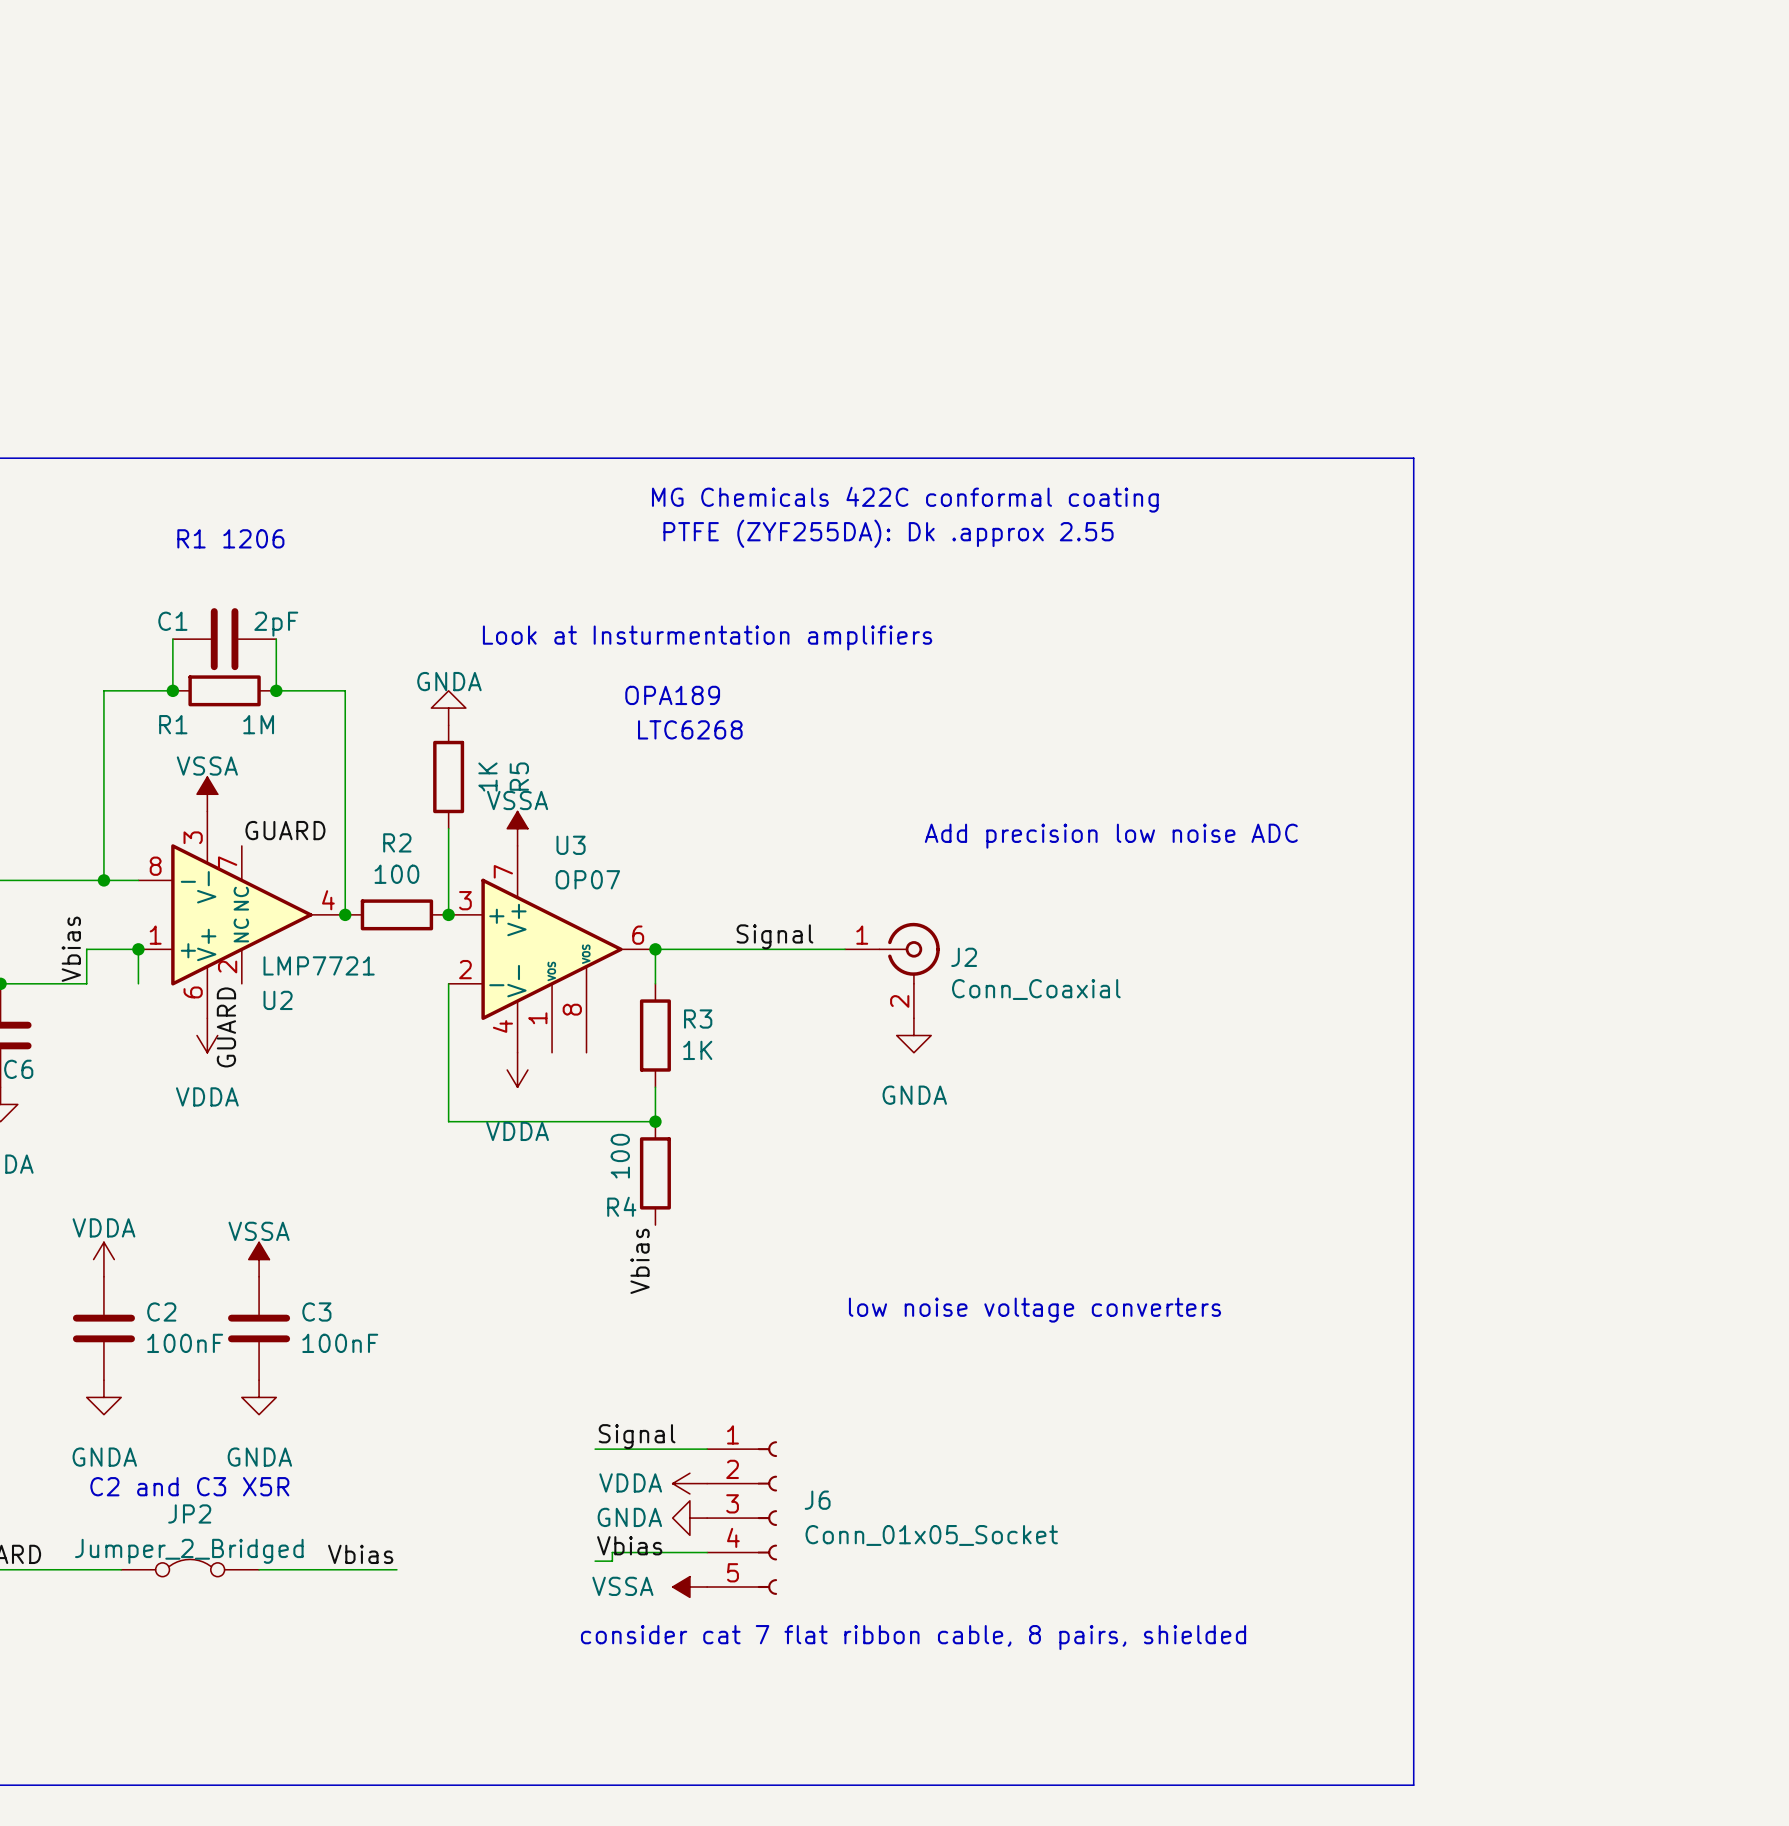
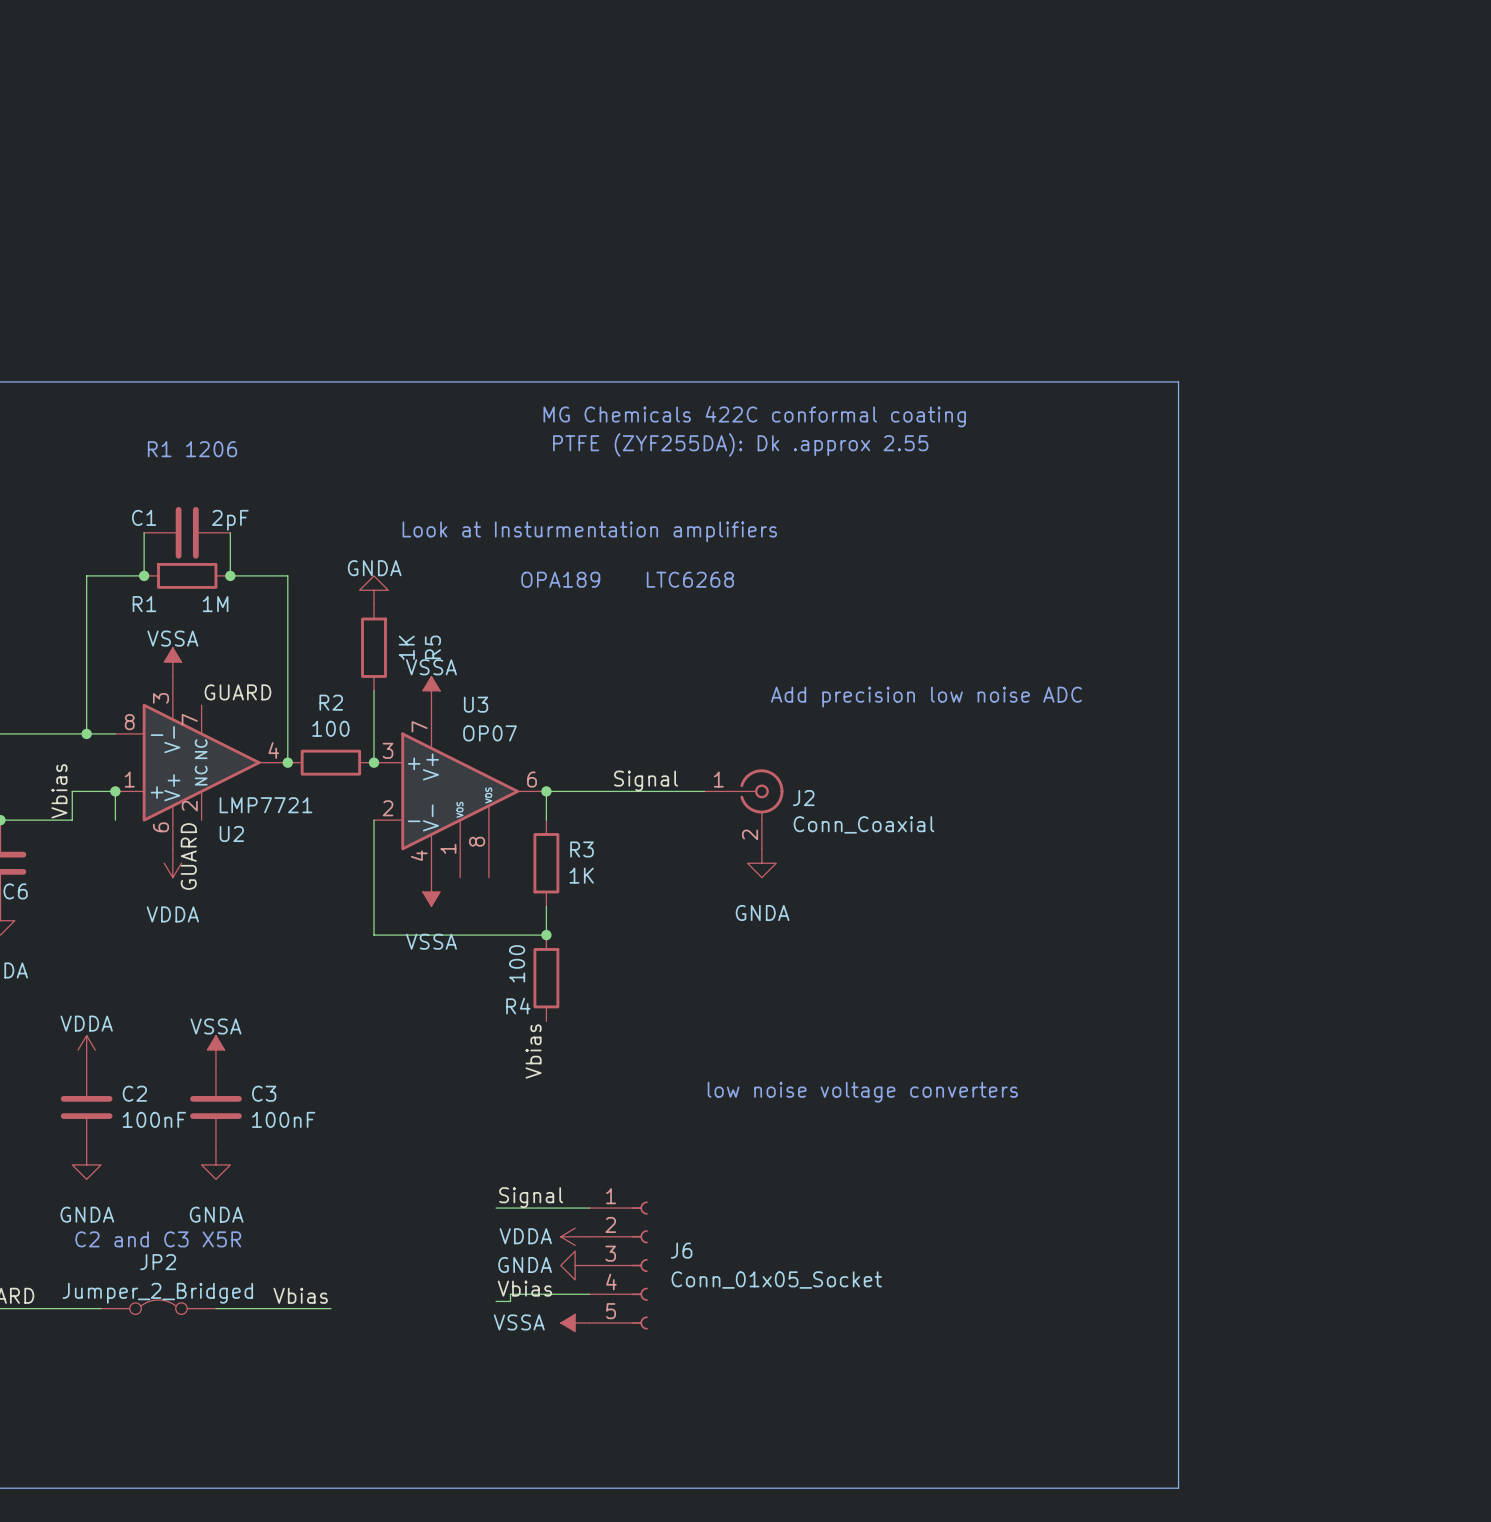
text position: LTC6268 (690, 729) -> LTC6268 (690, 579)
power symbol: VDDA (517, 1069) -> VSSA (431, 891)
text: consider cat 7 flat ribbon cable, 8 pairs, shielded (913, 1637) -> none

